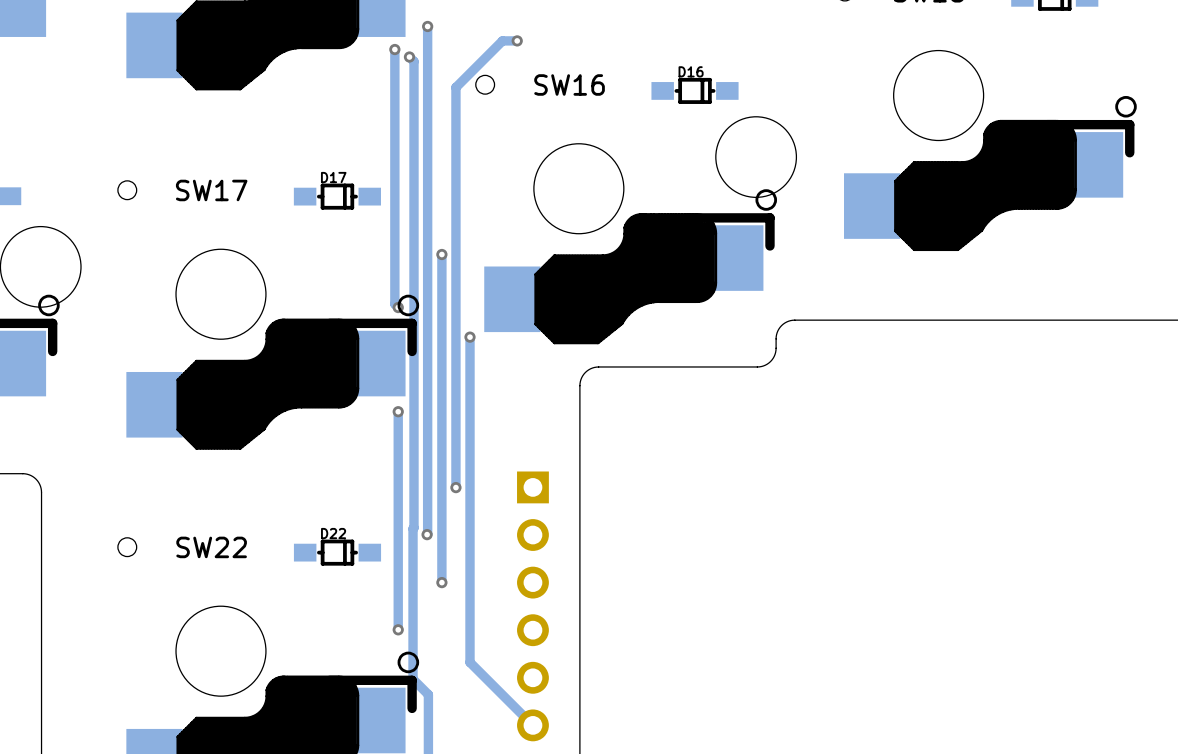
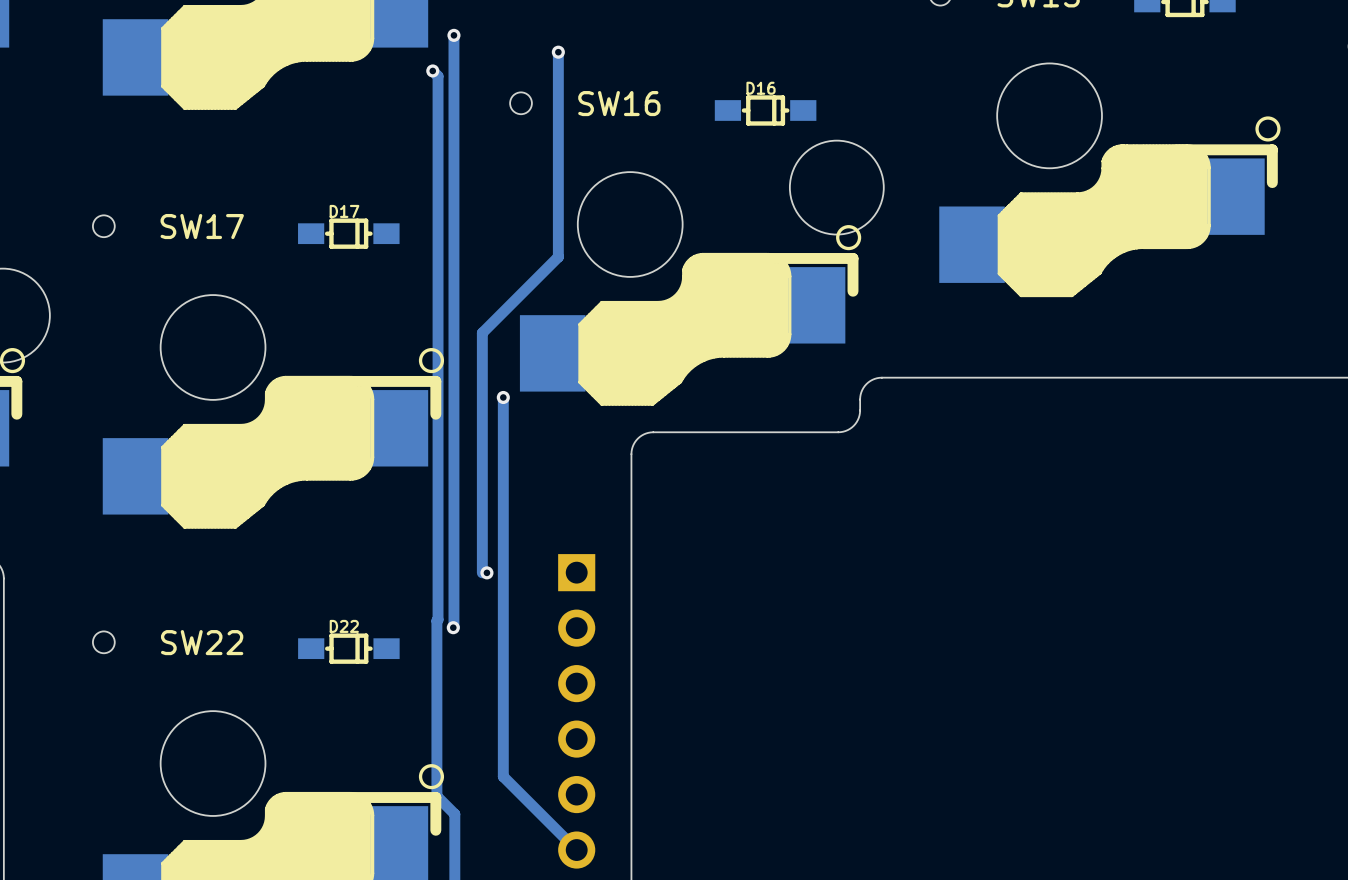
track: (517, 40) (502, 40) (455, 87) (455, 487) -> (558, 52) (558, 257) (482, 333) (482, 572)
track: (394, 49) (394, 304) (398, 307) -> none
via: (394, 49) -> none
track: (441, 254) (441, 582) -> none
via: (441, 254) -> none
via: (398, 307) -> none
track: (398, 411) (398, 629) -> none
via: (398, 411) -> none
via: (441, 582) -> none
via: (398, 629) -> none

